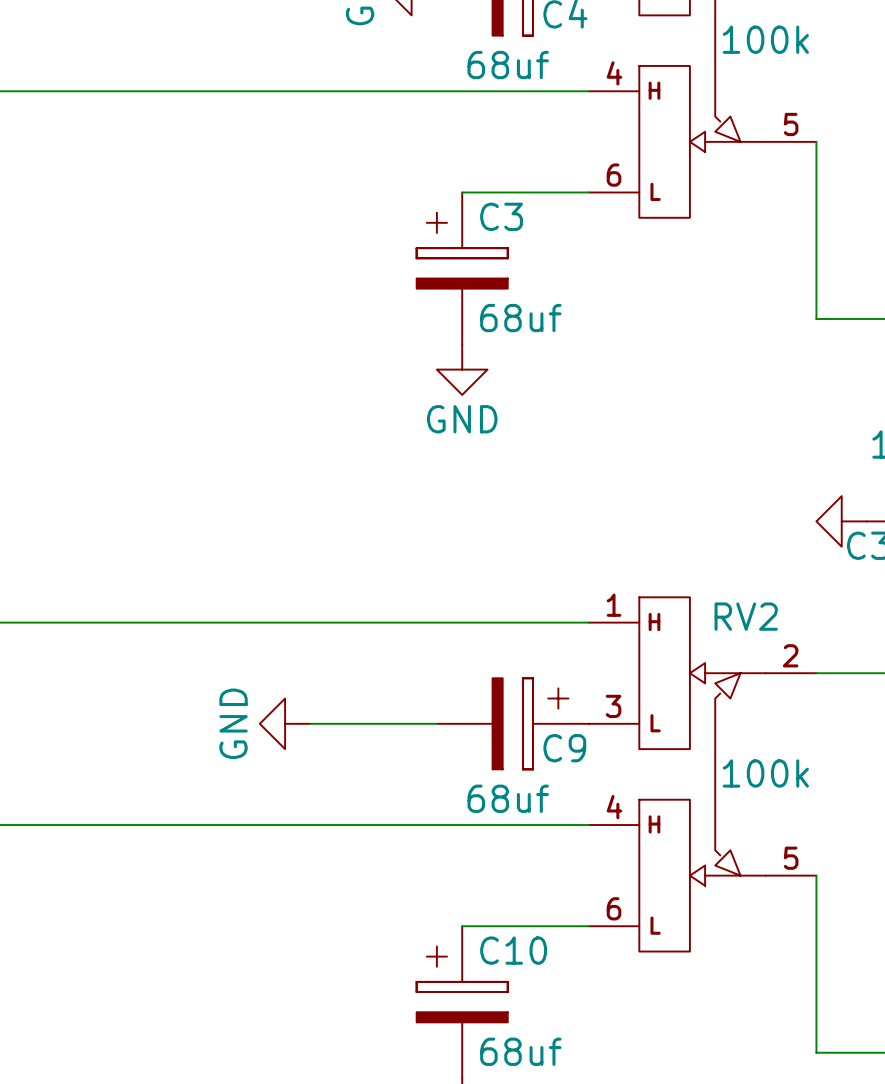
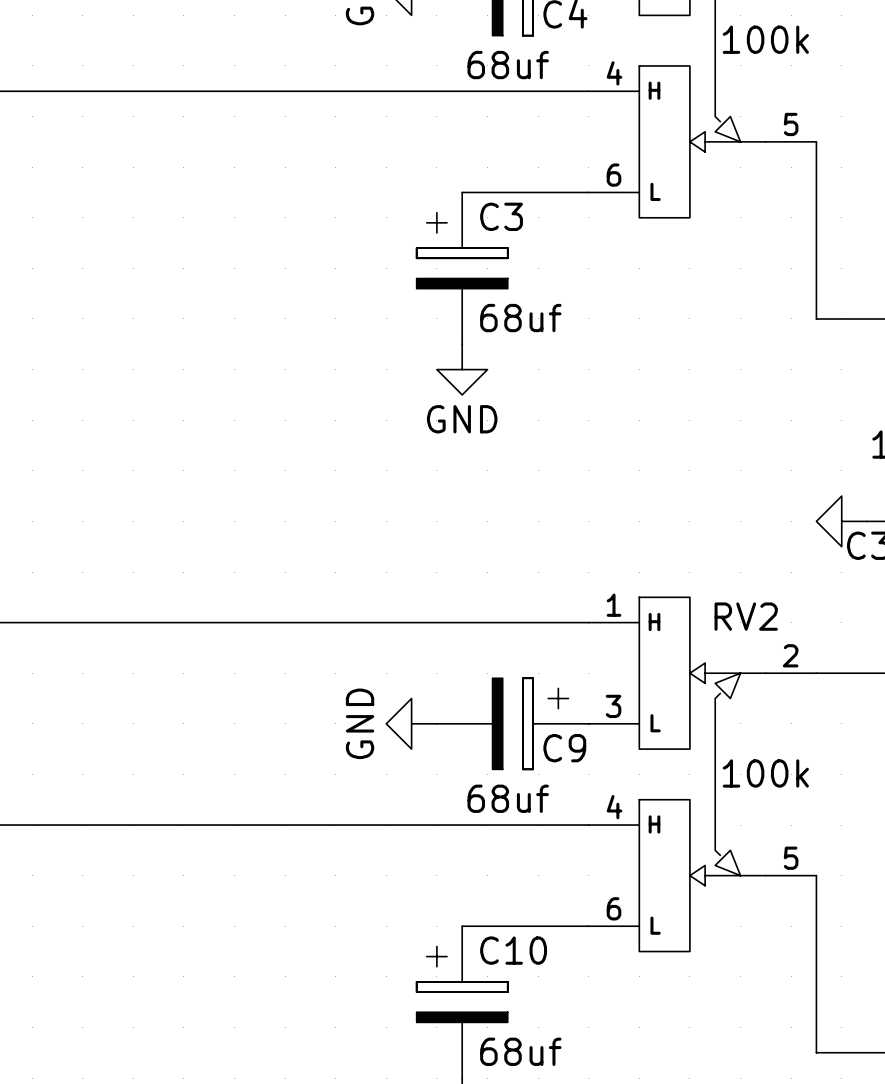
power symbol position: GND (285, 723) -> GND (411, 723)
wire: (310, 723) (436, 723) -> none

